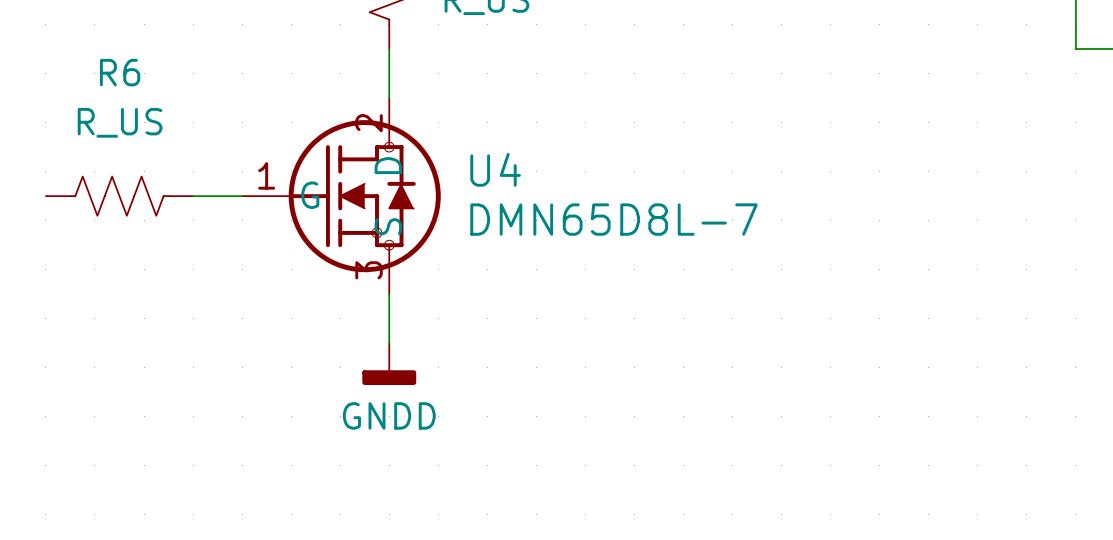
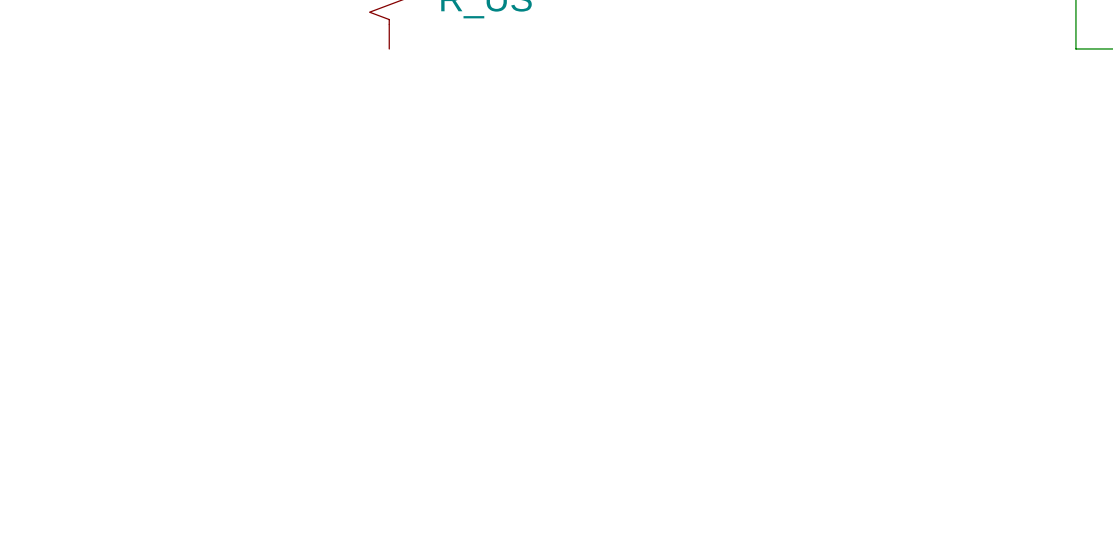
wire: (389, 48) (389, 98) -> none
R6: R_US (119, 196) -> none
wire: (193, 196) (242, 196) -> none
U4: DMN65D8L-7 (341, 196) -> none
wire: (389, 294) (389, 343) -> none
power symbol: GNDD (389, 364) -> none

